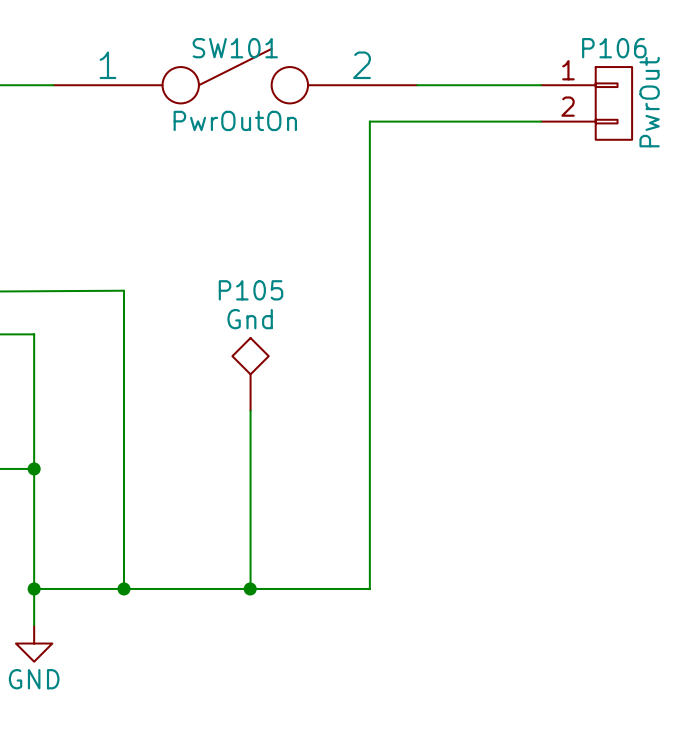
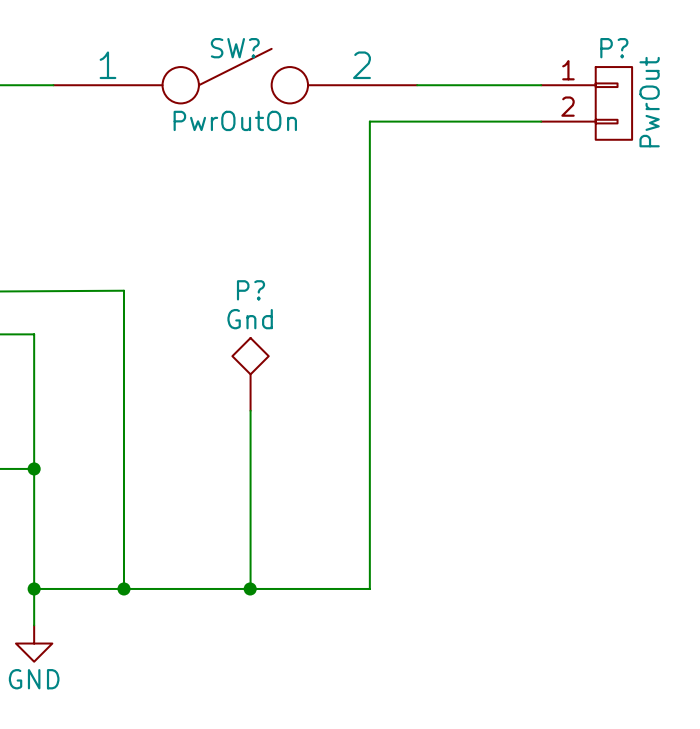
SW101 name: SW101 (235, 48) -> SW? (235, 48)
P106 name: P106 (614, 48) -> P? (614, 48)
P105 name: P105 (251, 290) -> P? (251, 290)

